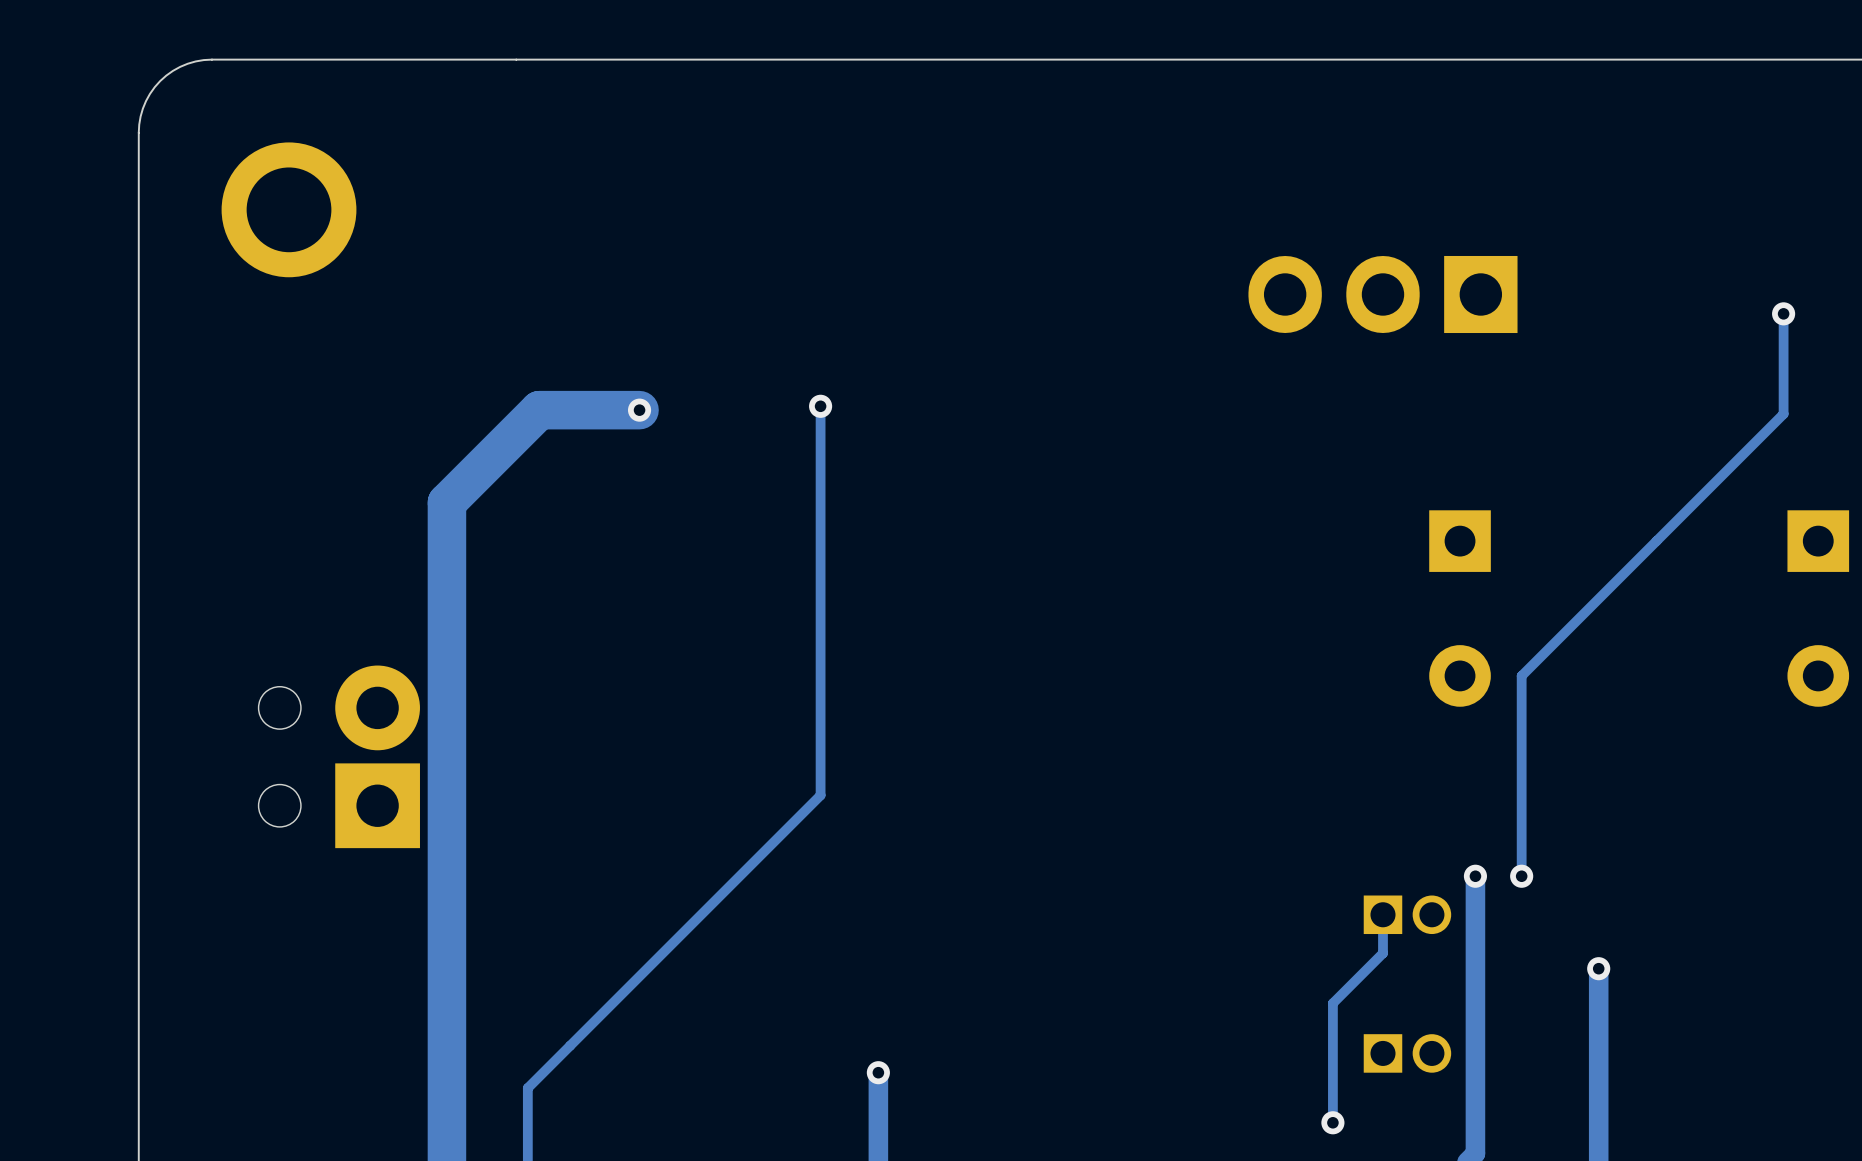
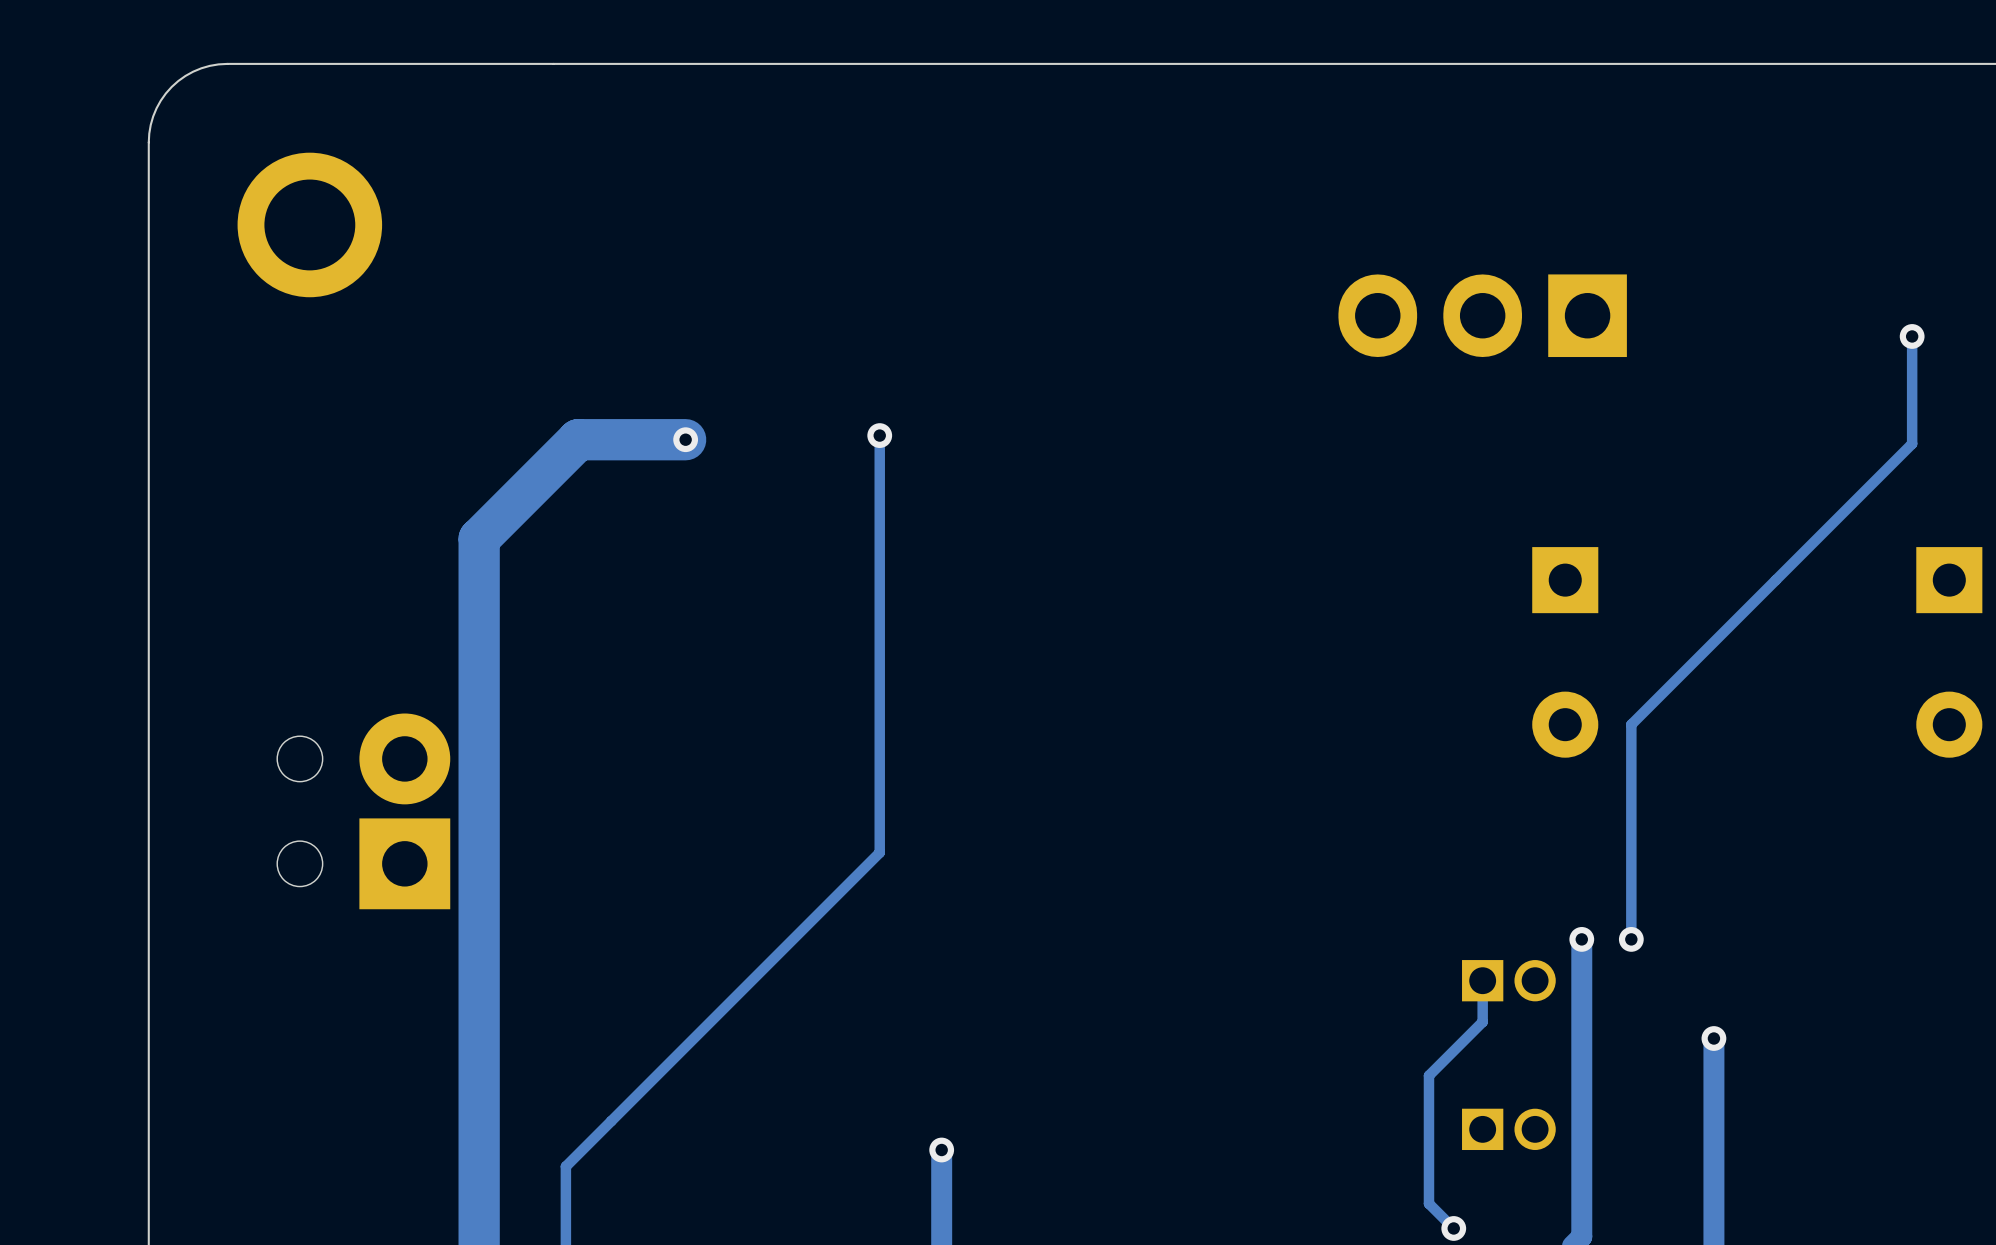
track: none -> (1428, 1203) (1453, 1228)
via position: (1332, 1122) -> (1453, 1228)

